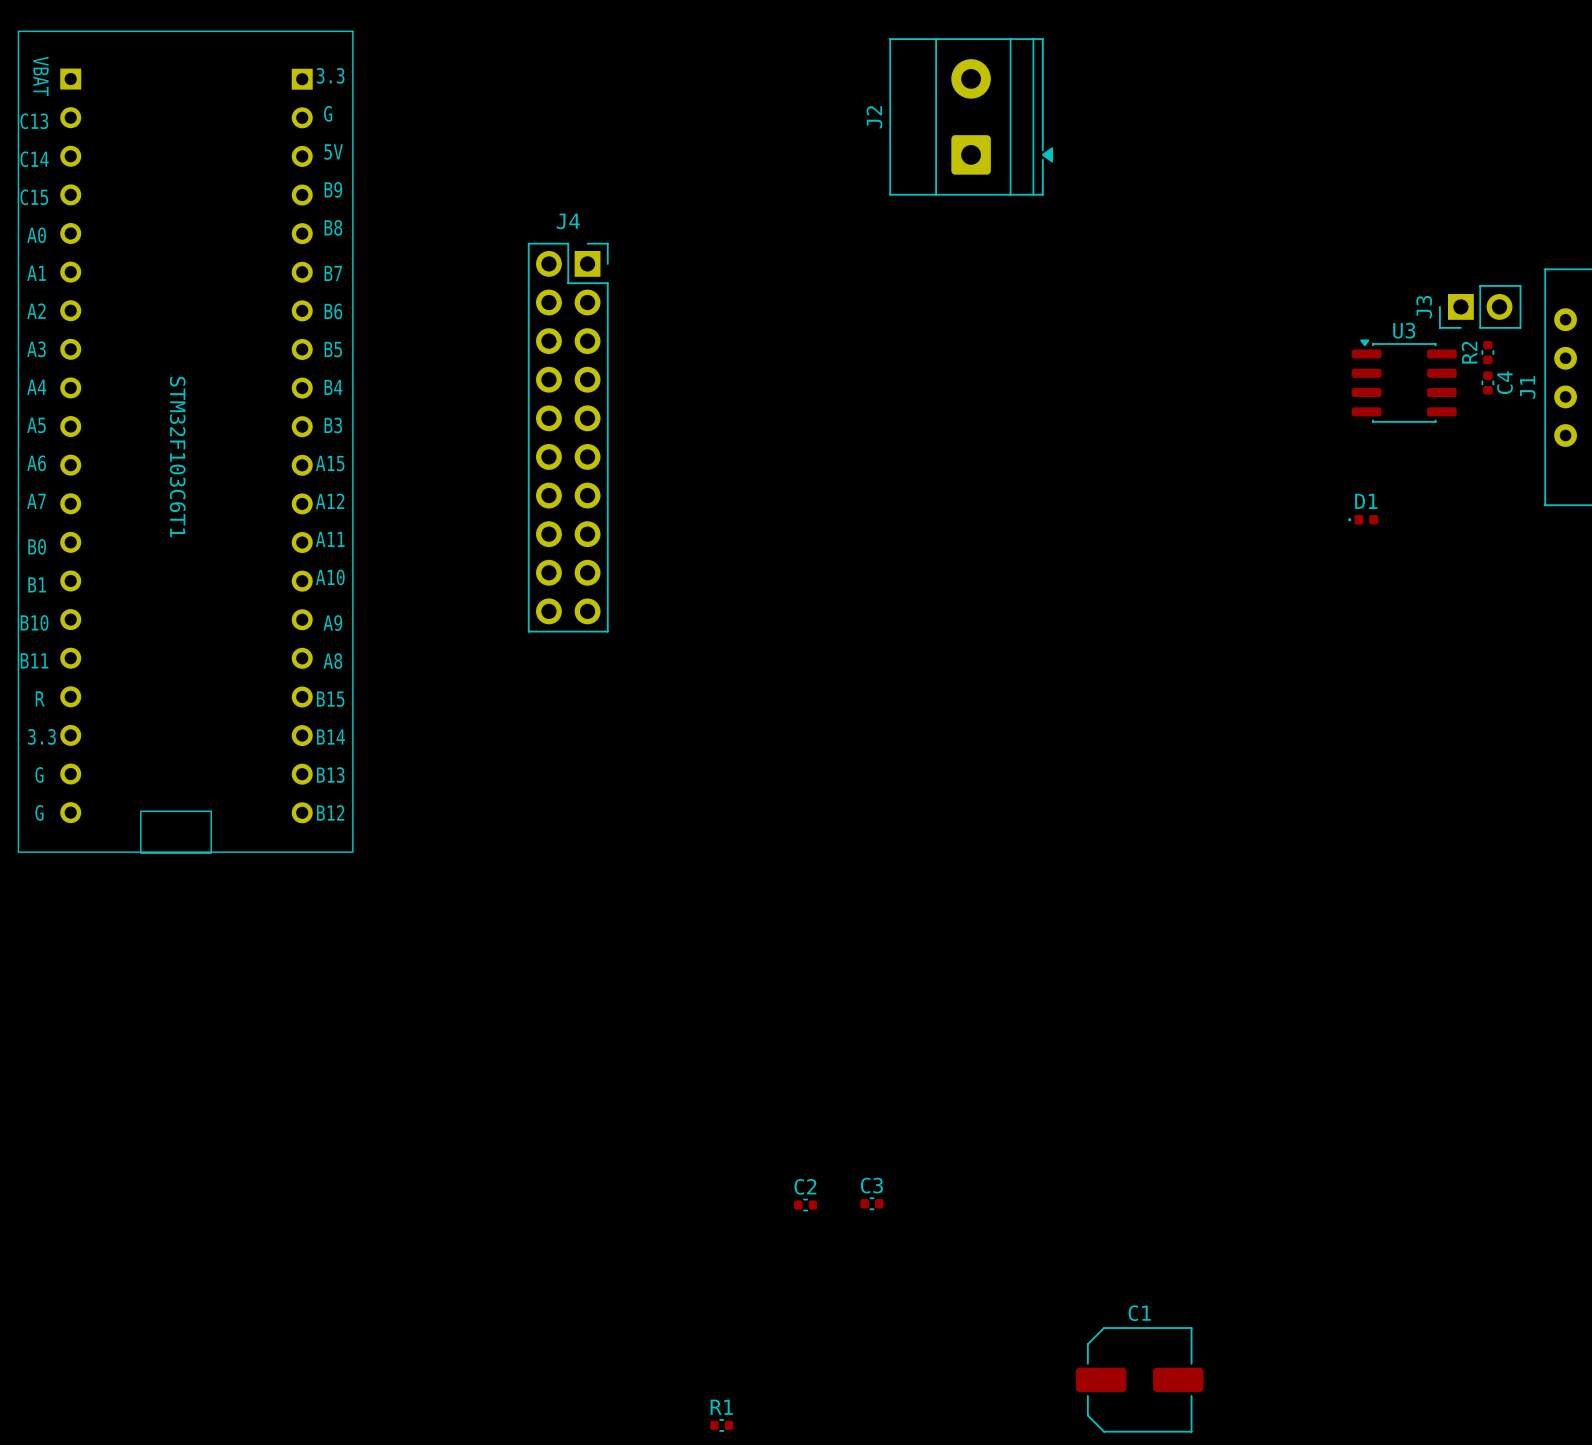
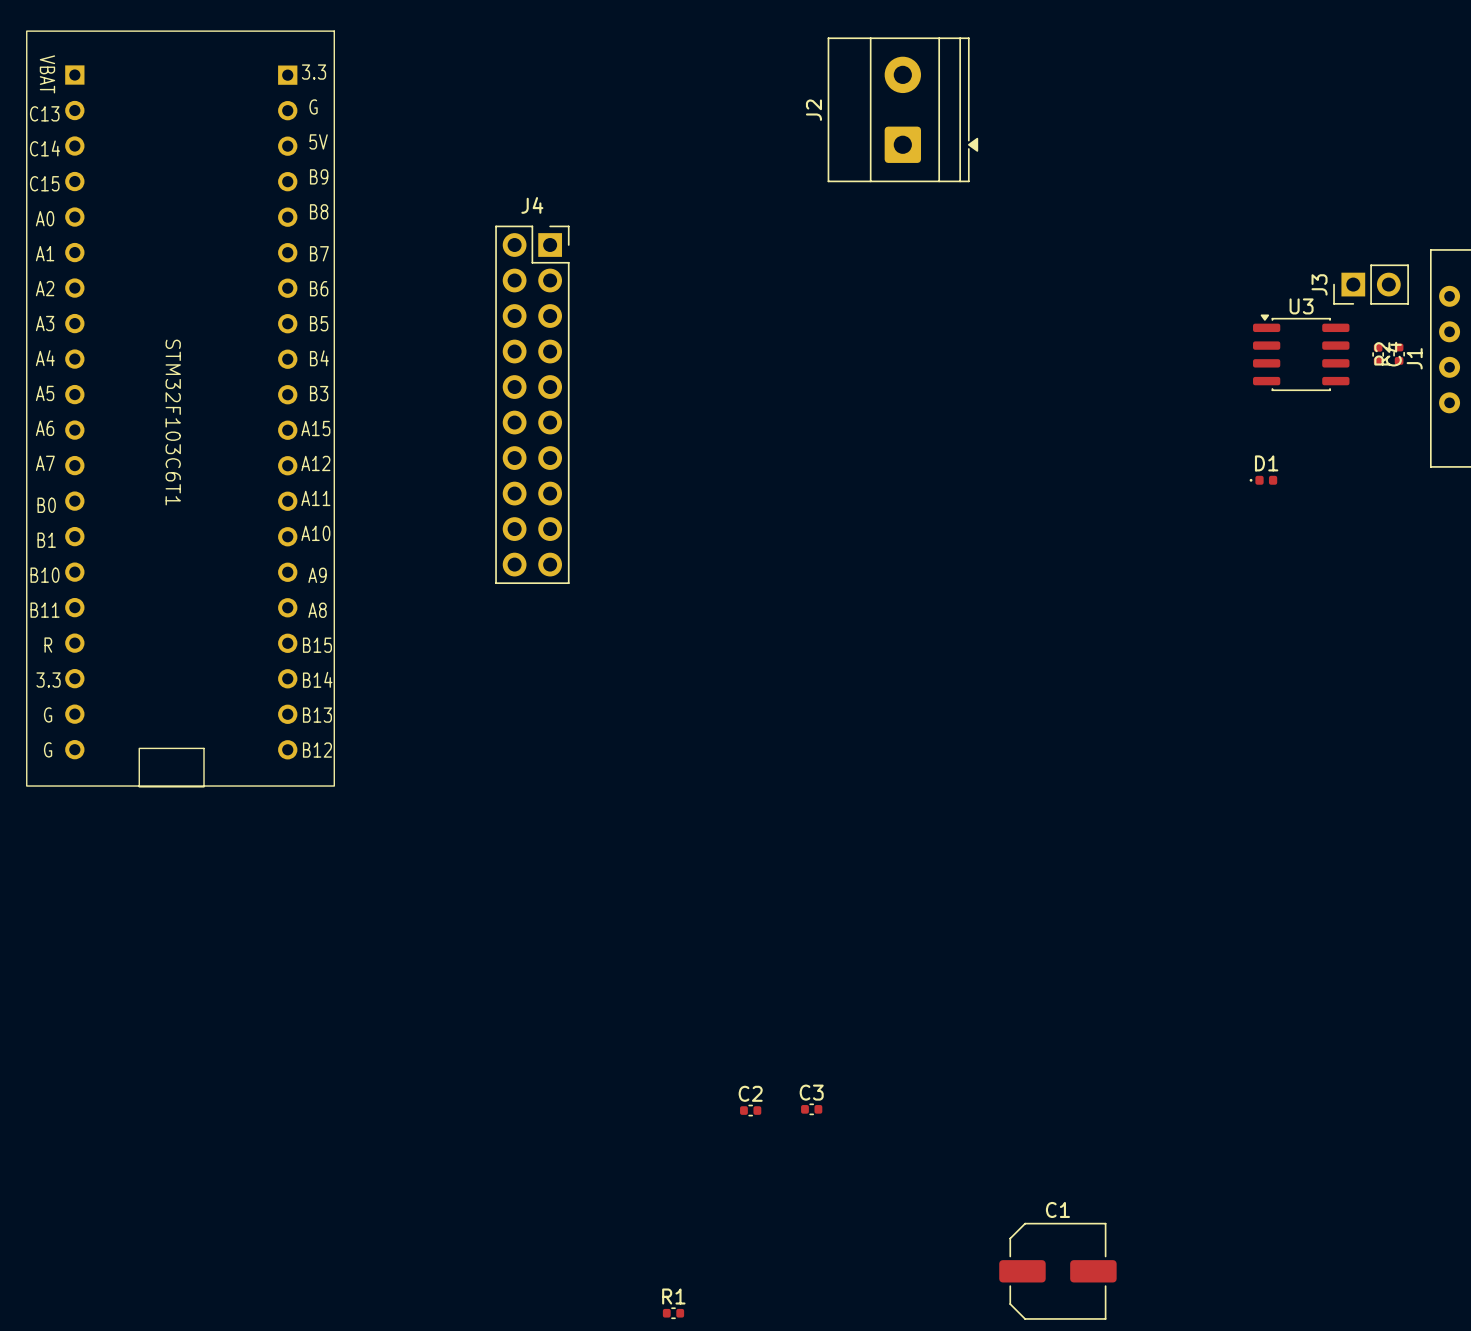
R2 position: (1487, 352) -> (1399, 354)

